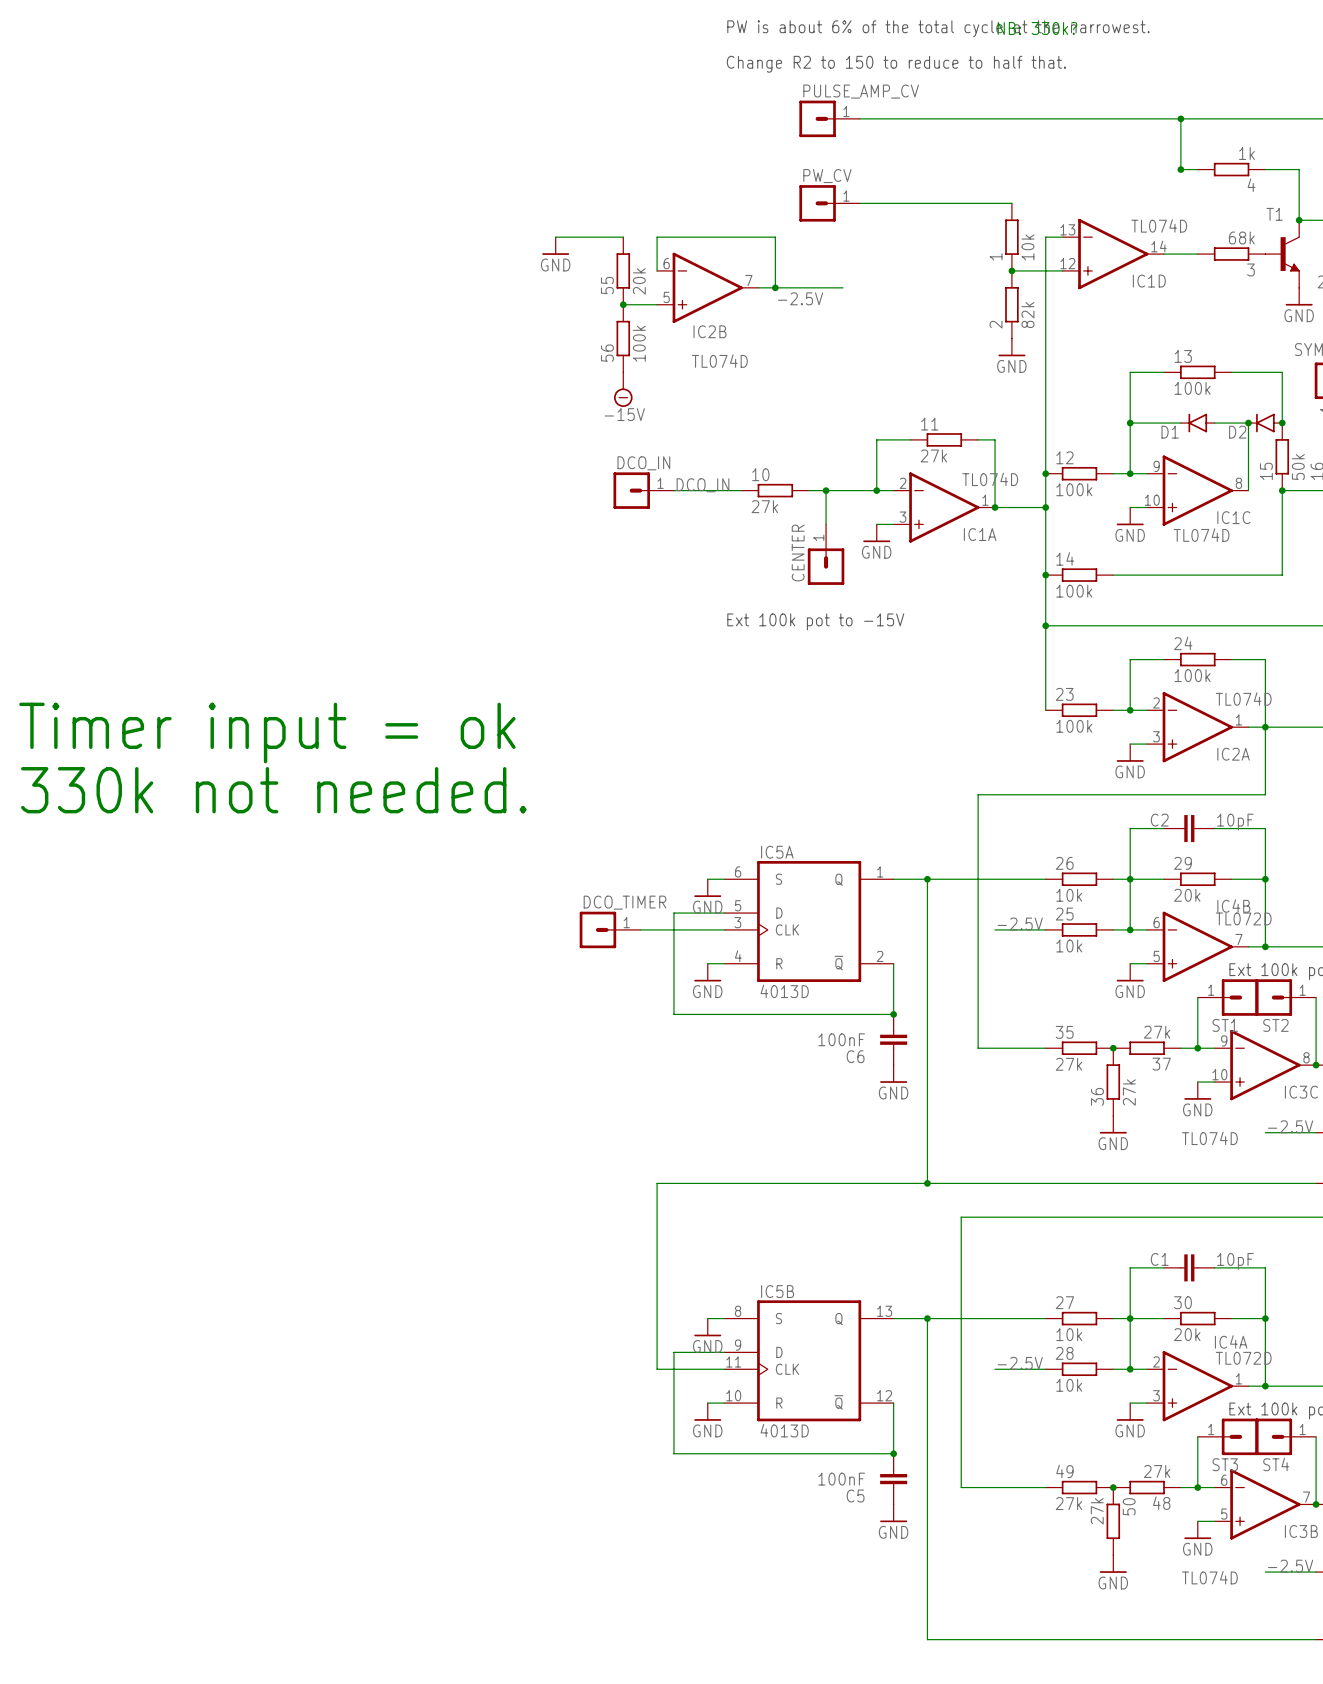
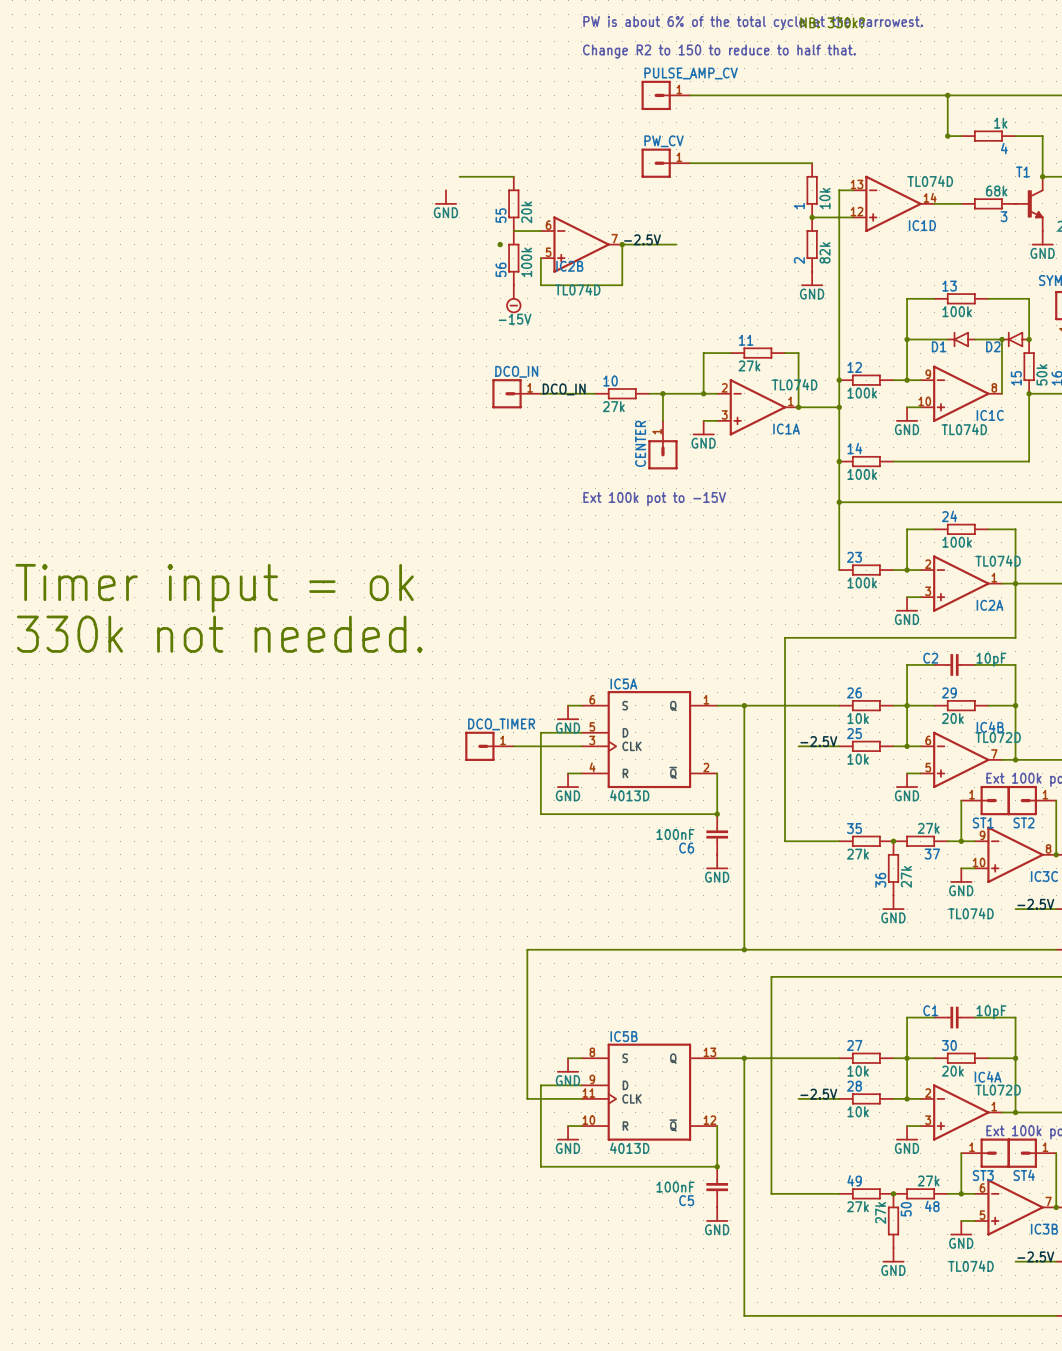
wire: (555, 237) (623, 237) -> (459, 176) (513, 176)
55 position: (623, 270) -> (513, 203)
wire: (657, 270) (657, 237) (775, 237) (775, 287) -> none
IC2B position: (707, 287) -> (581, 244)
wire: (758, 287) (842, 287) -> none
junction position: (775, 287) -> (622, 244)
wire: (623, 304) (657, 304) -> (513, 231) (540, 231)
wire: none -> (676, 244) (622, 244) (622, 285) (540, 285) (540, 258)
56 position: (623, 338) -> (513, 258)
power symbol position: -15V (623, 389) -> -15V (513, 299)

